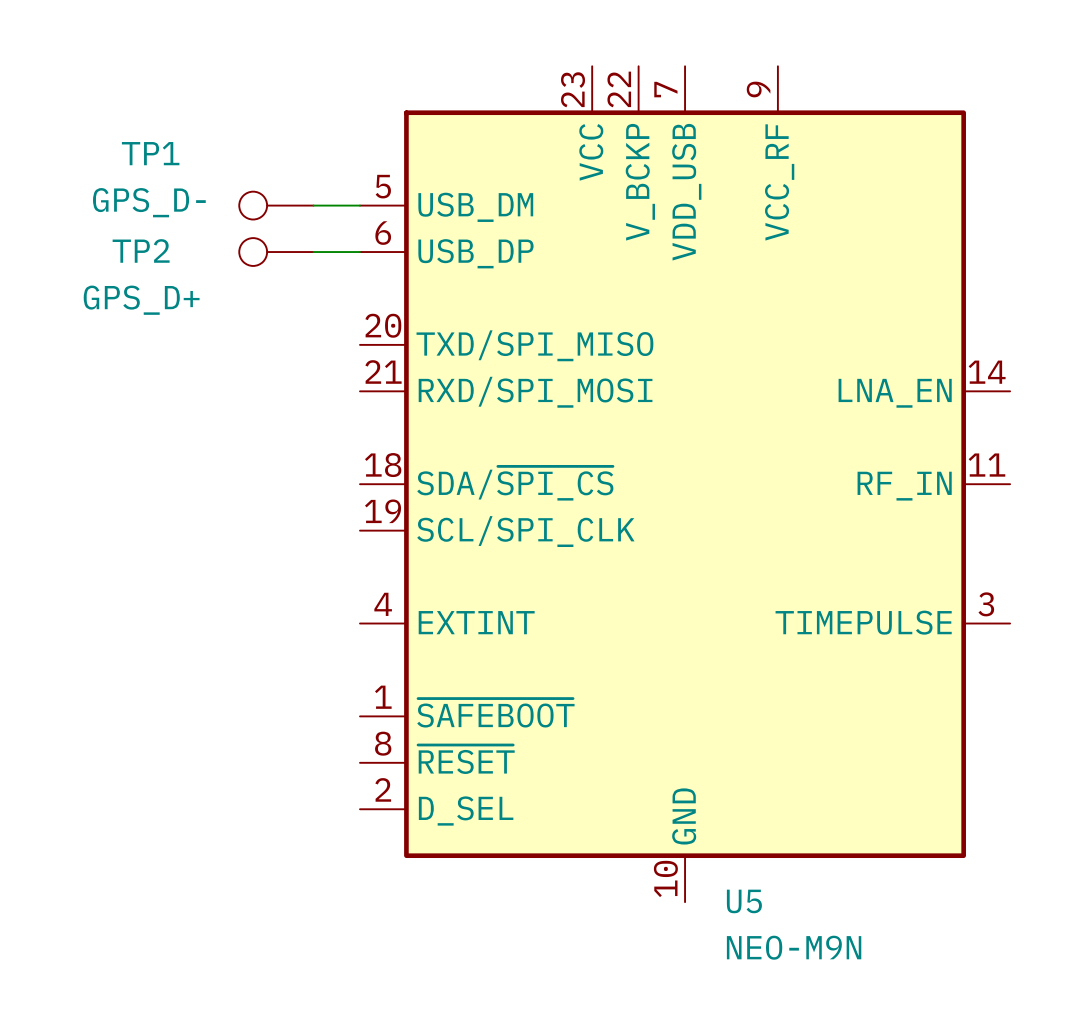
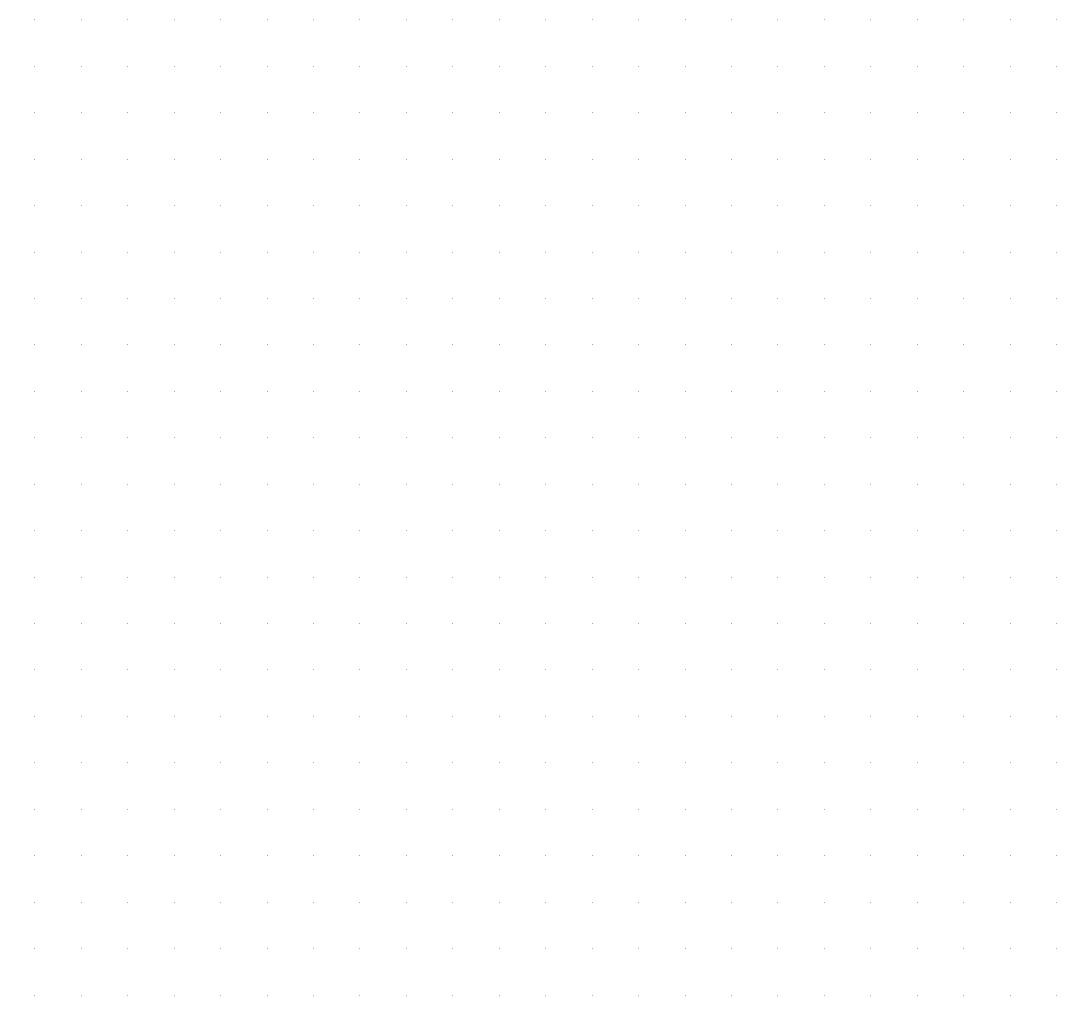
TP1: GPS_D- (276, 205) -> none
wire: (313, 205) (359, 205) -> none
TP2: GPS_D+ (276, 252) -> none
wire: (313, 252) (359, 252) -> none
U5: NEO-M9N (685, 484) -> none

